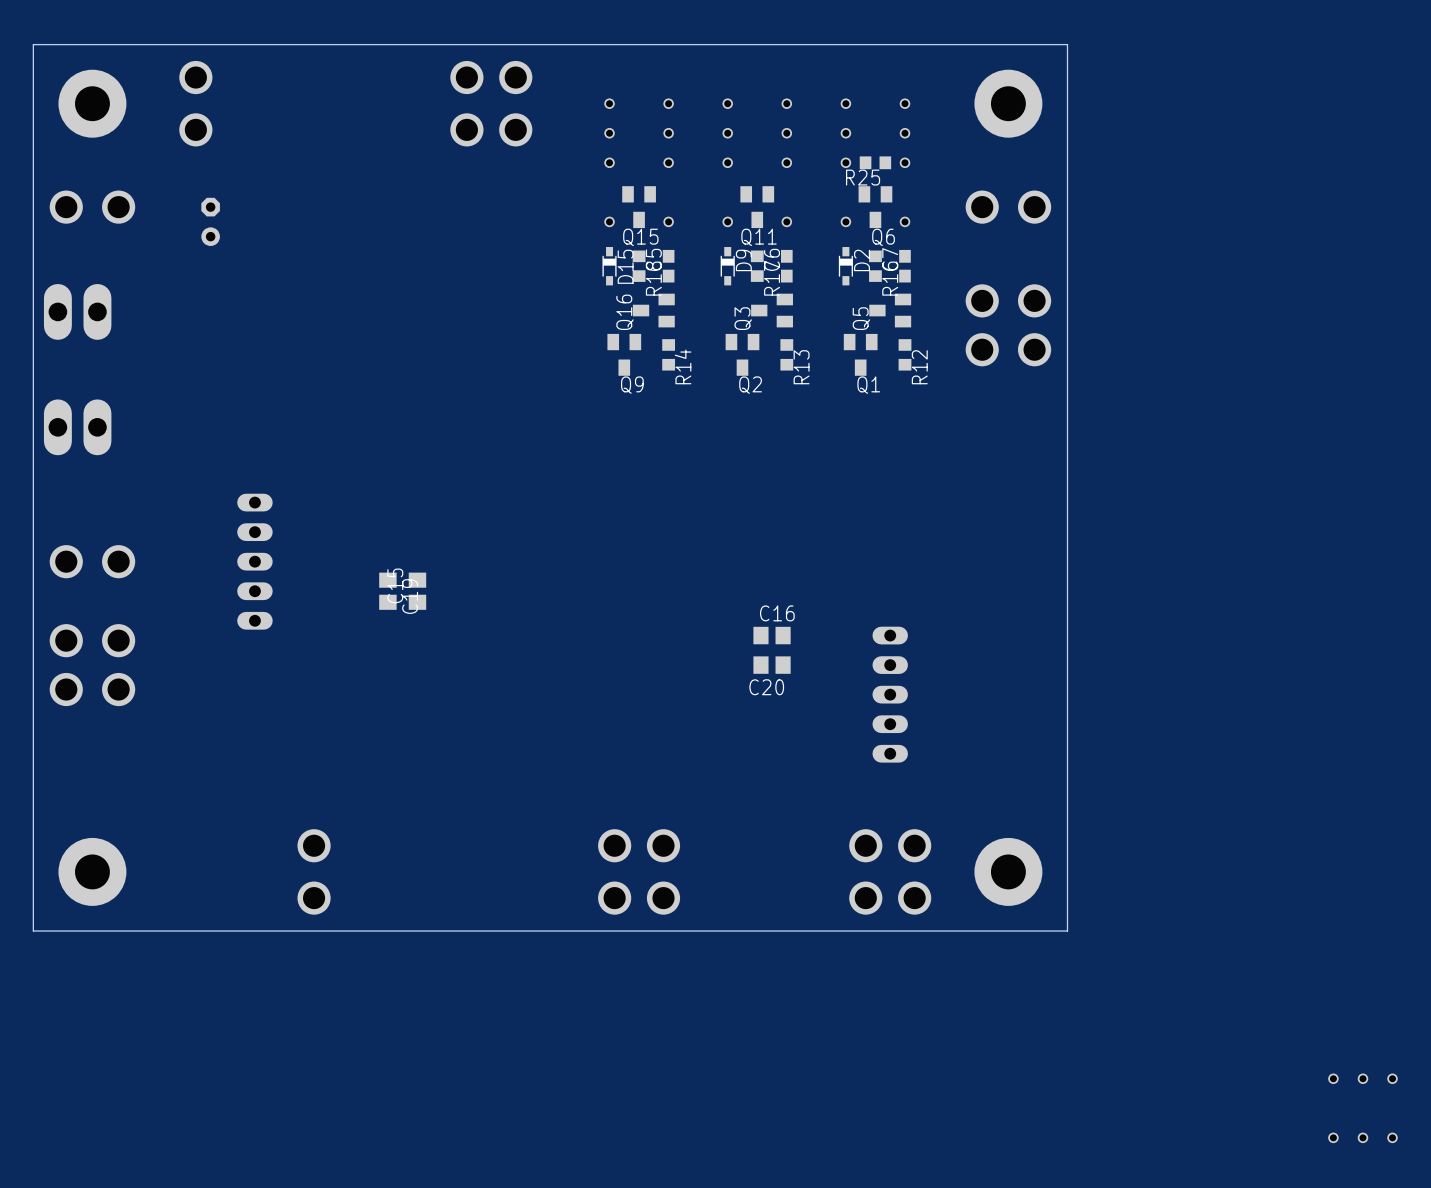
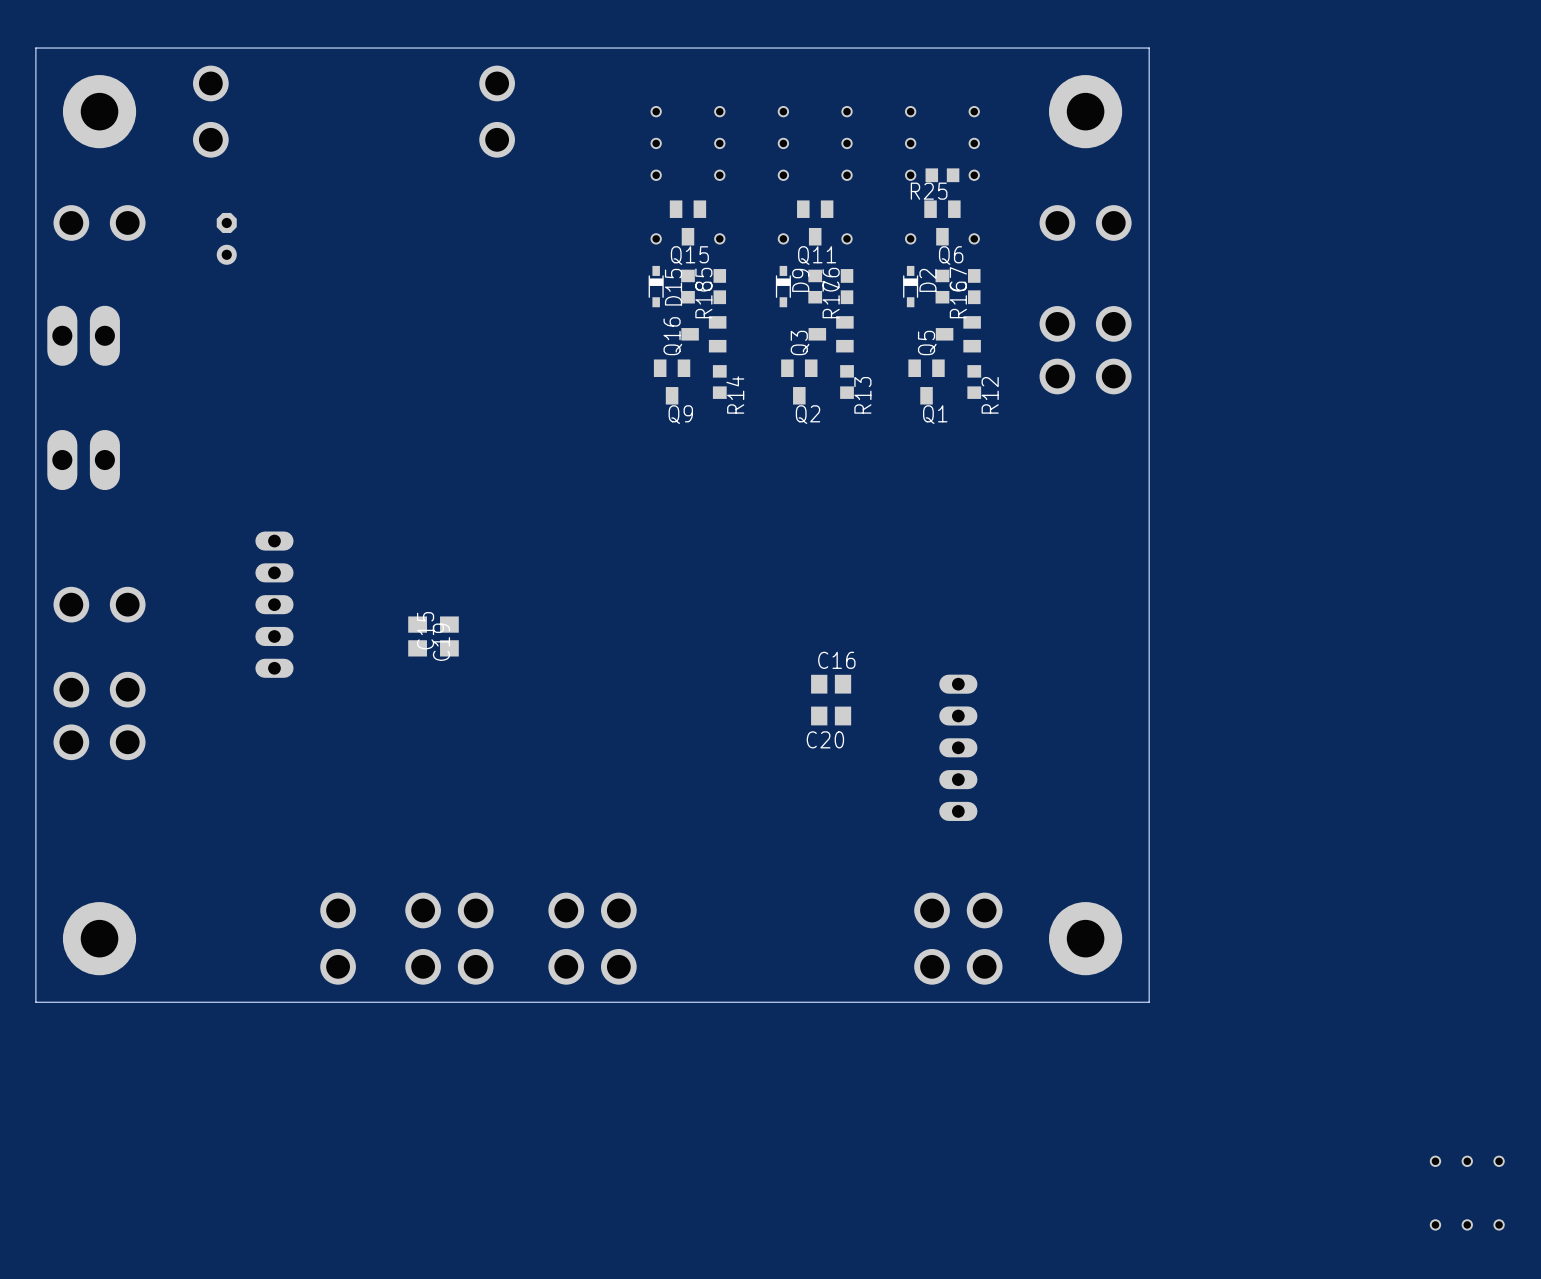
part: none -> (497, 111)
part: (491, 103) -> none
part: none -> (449, 938)
part position: (639, 871) -> (592, 938)

